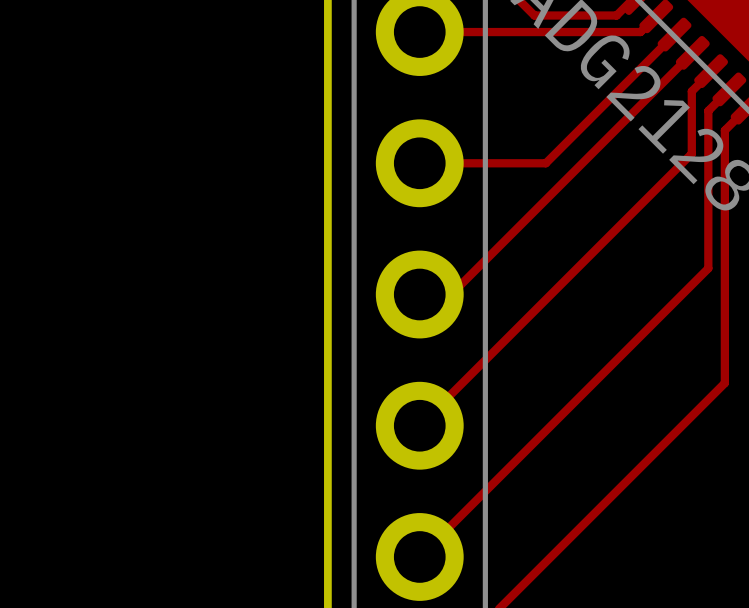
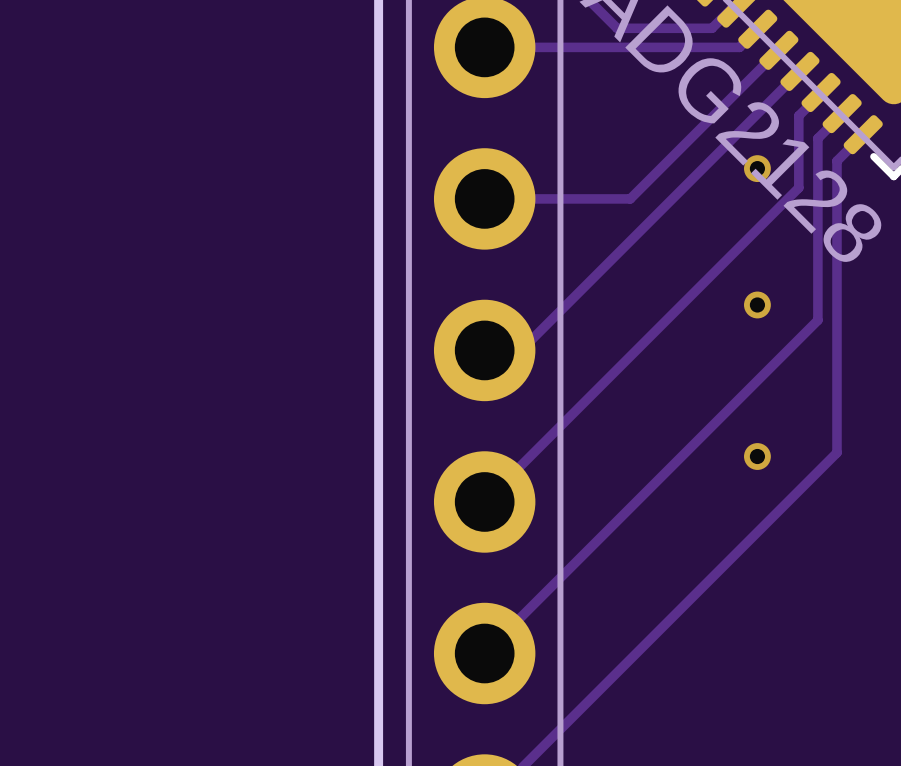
via: none -> (757, 168)
via: none -> (757, 304)
via: none -> (757, 456)

